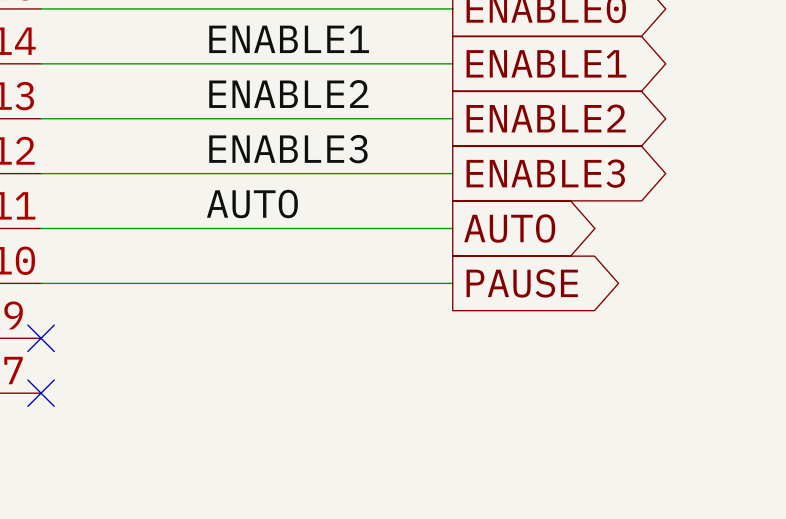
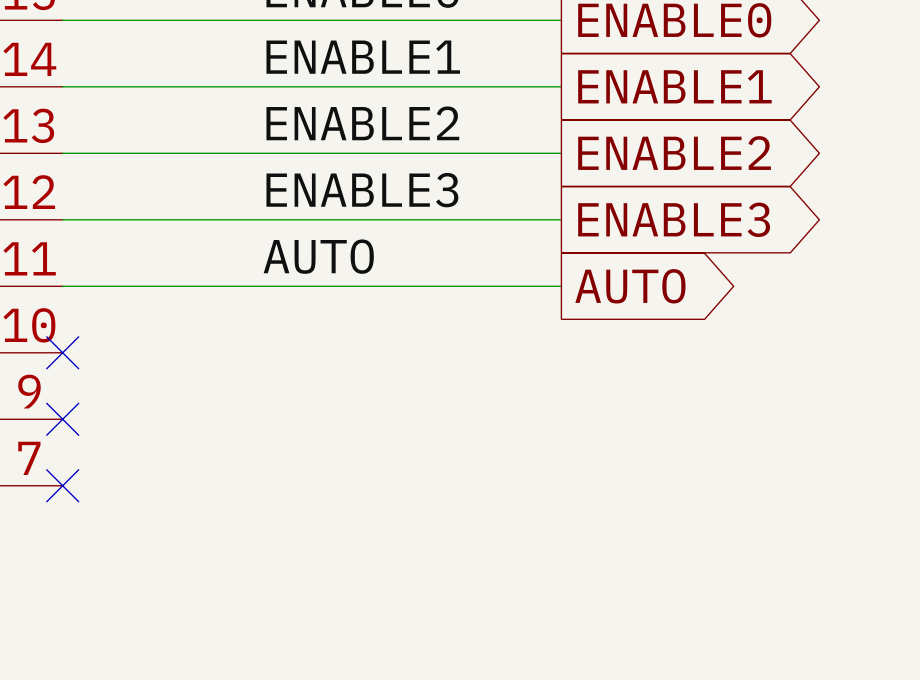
wire: (41, 283) (452, 283) -> none
no-connect mark: none -> (62, 352)
global label: PAUSE (522, 283) -> none

